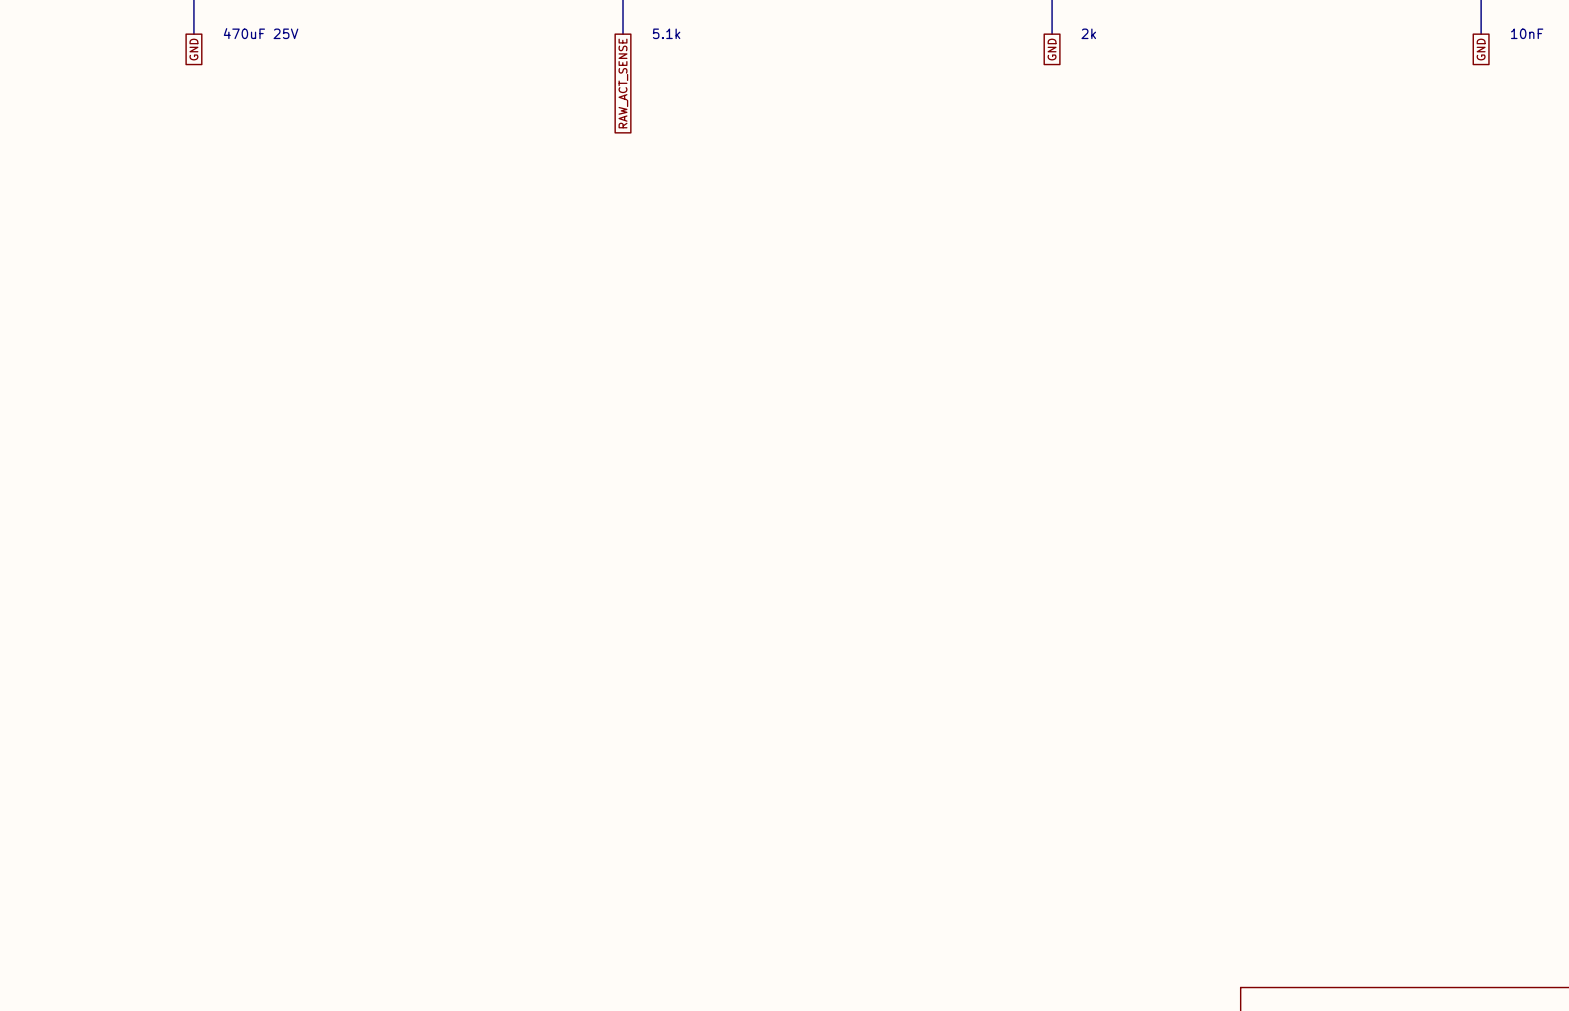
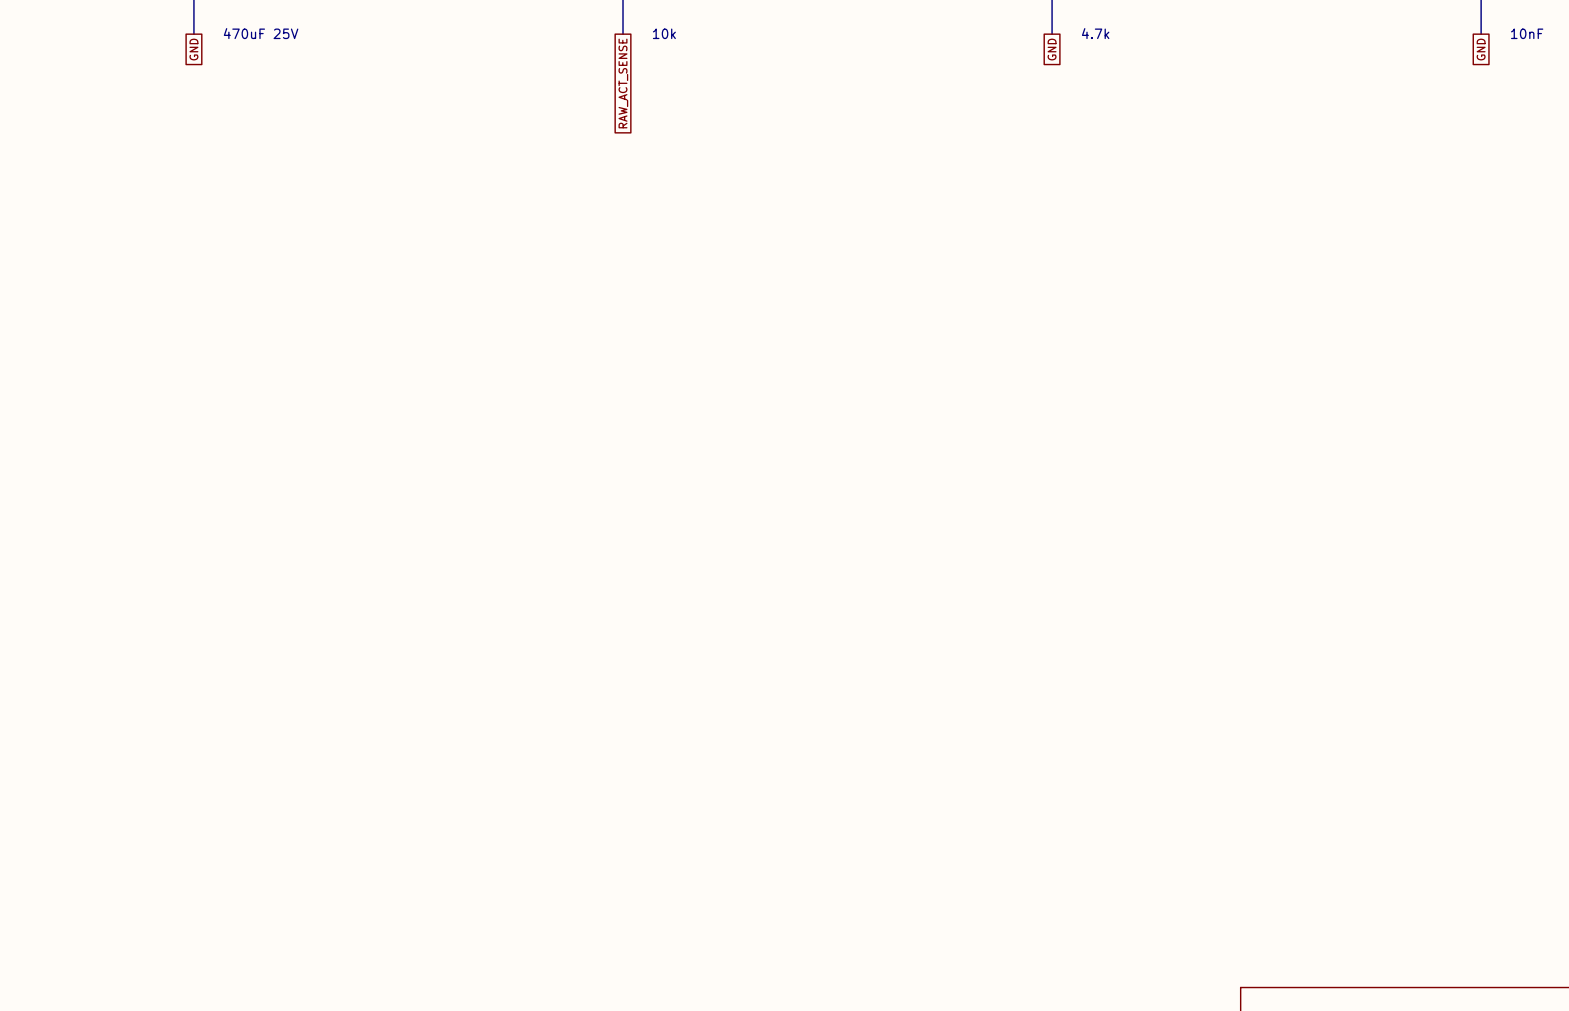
part value: 5.1k (666, 33) -> 10k (664, 33)
part value: 2k (1088, 33) -> 4.7k (1095, 33)

